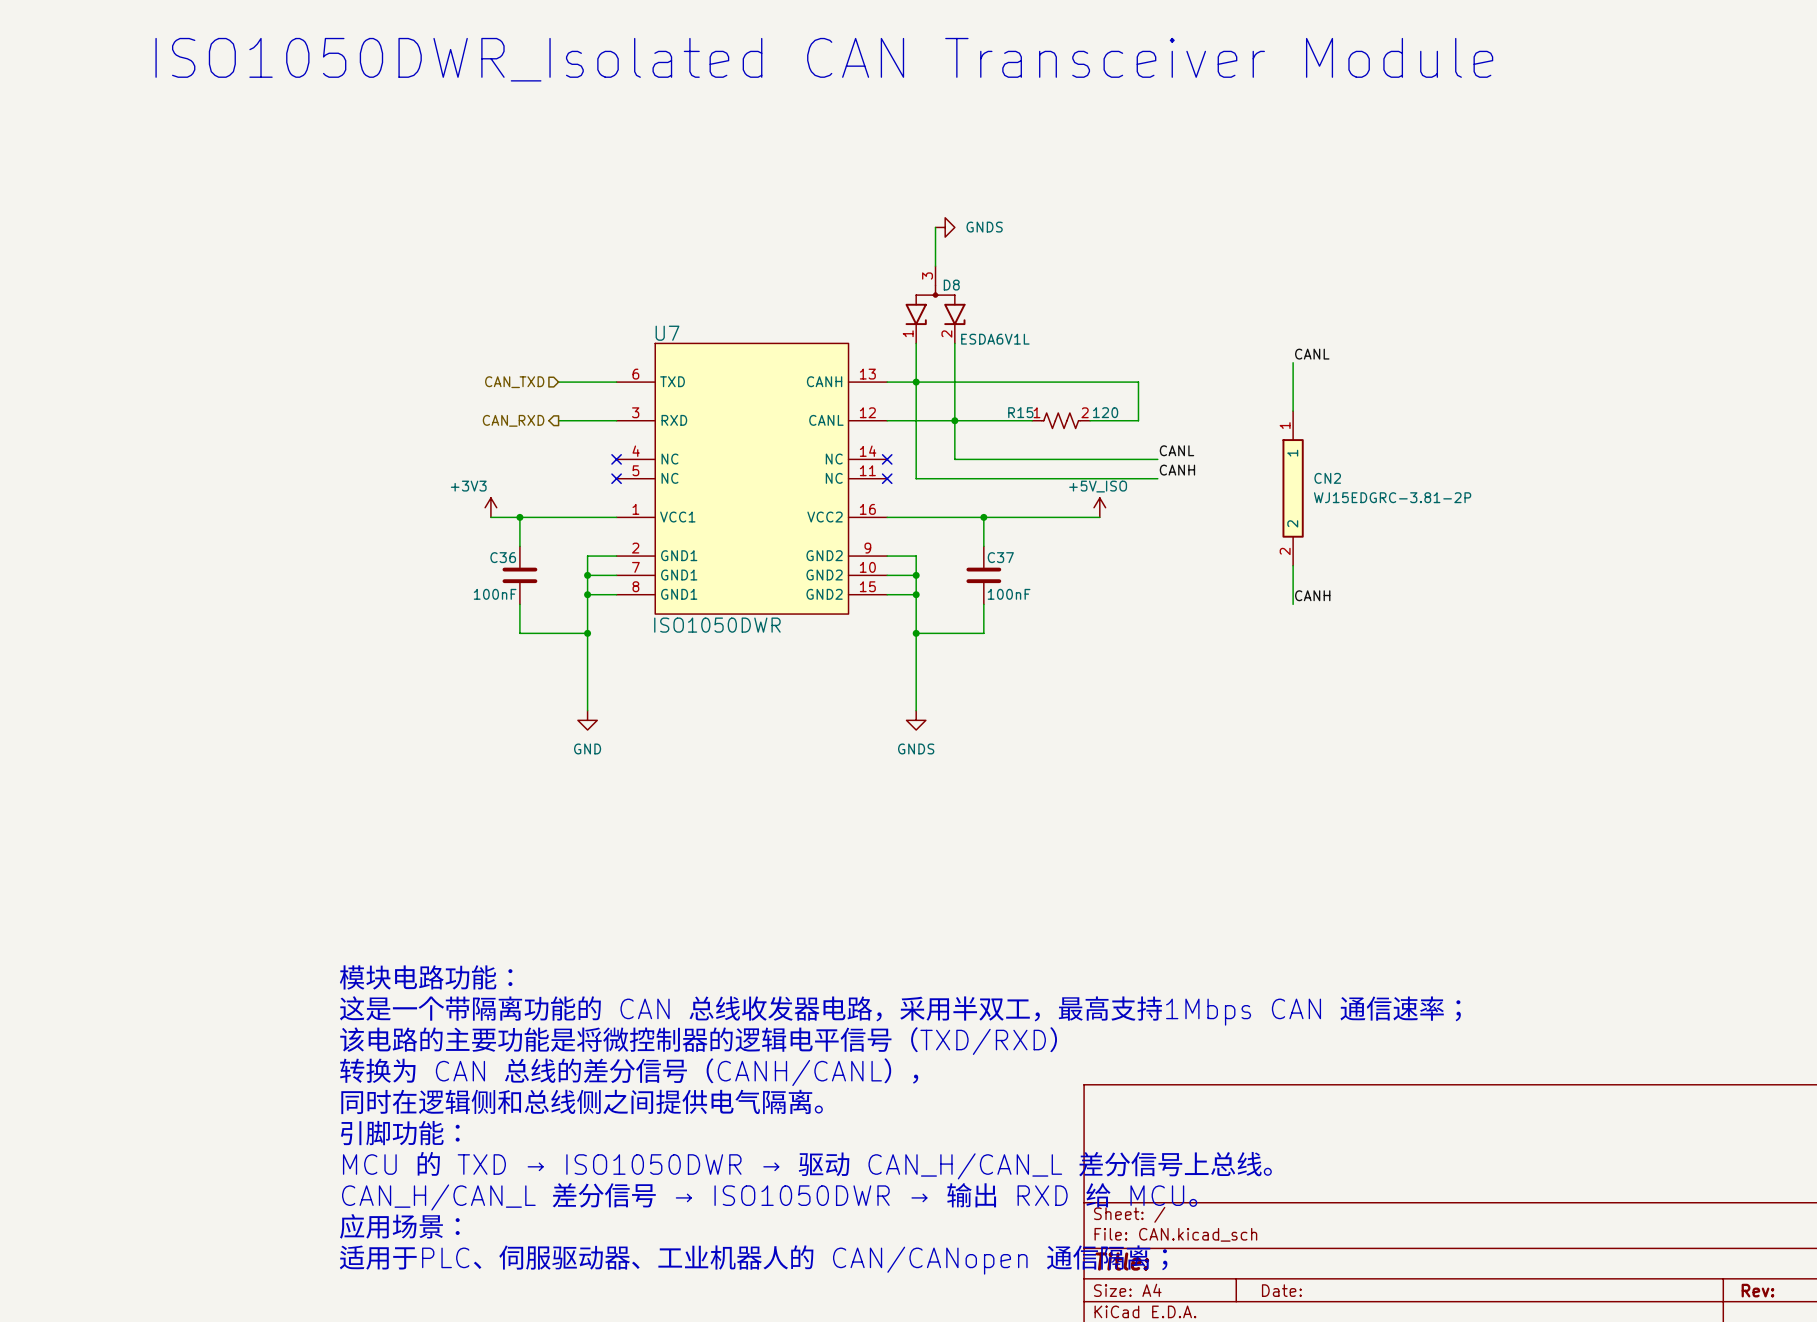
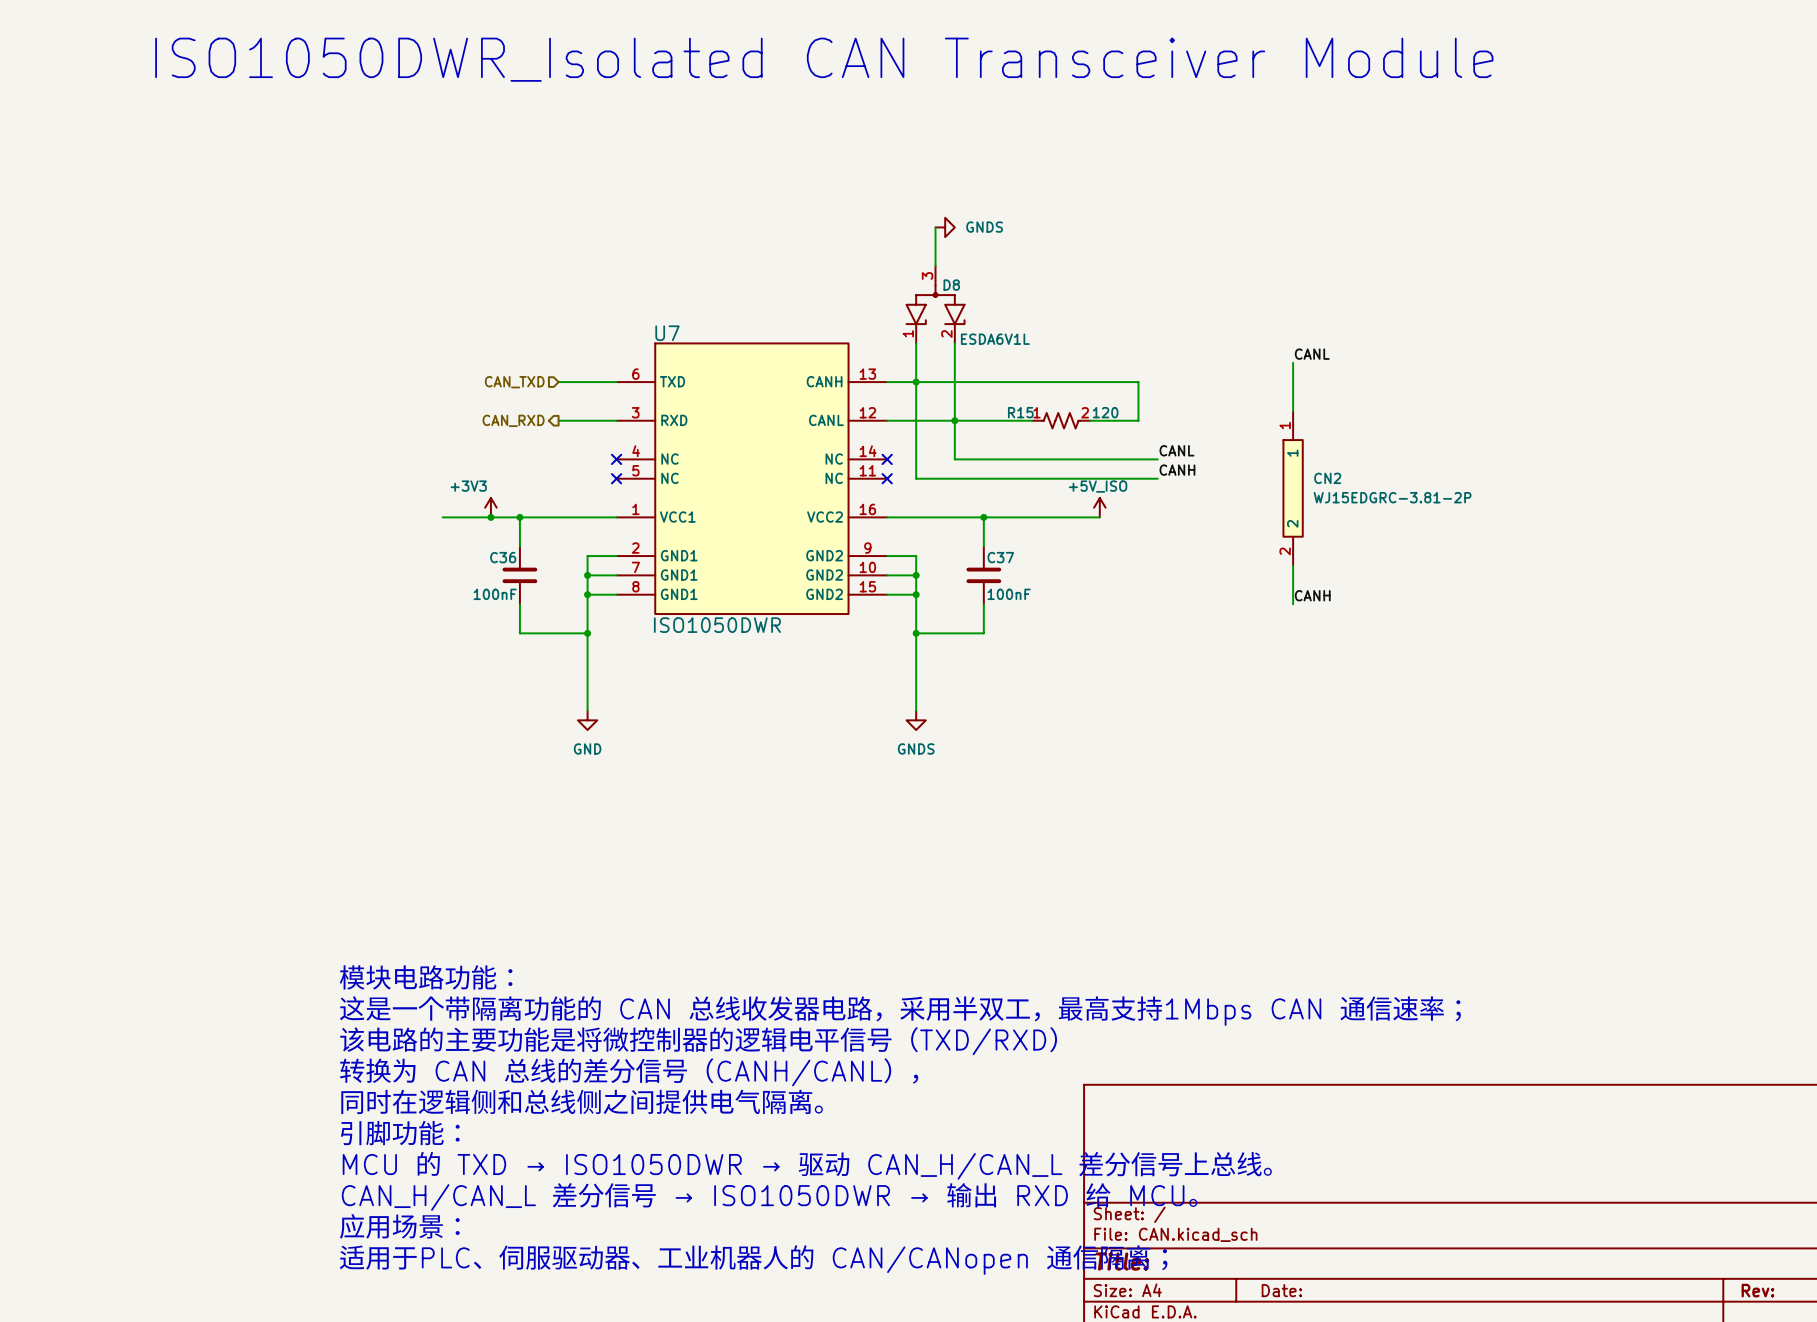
wire: none -> (442, 517) (490, 517)
junction: none -> (490, 517)

